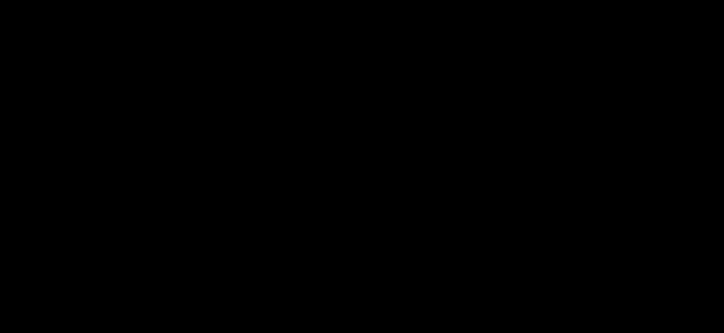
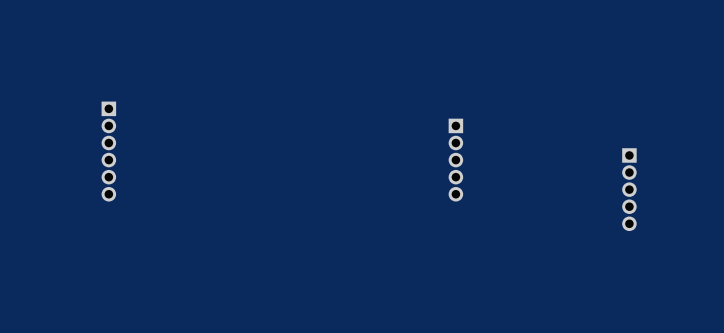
part: none -> (108, 151)
part: none -> (455, 160)
part: none -> (629, 189)

